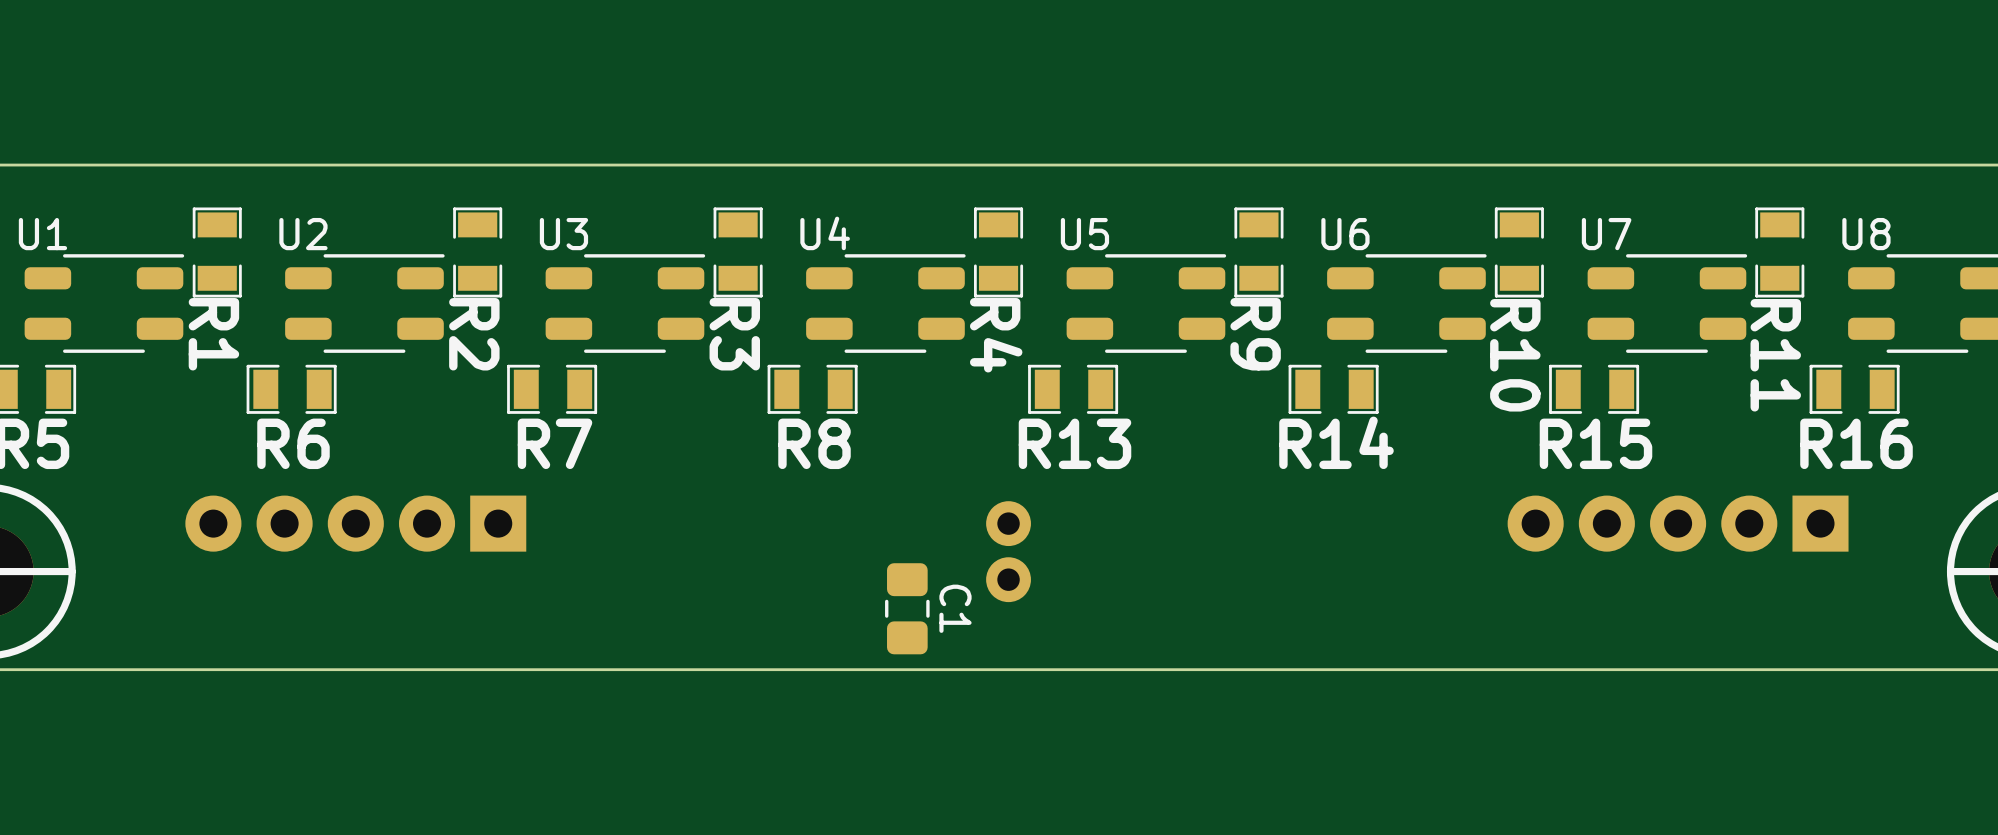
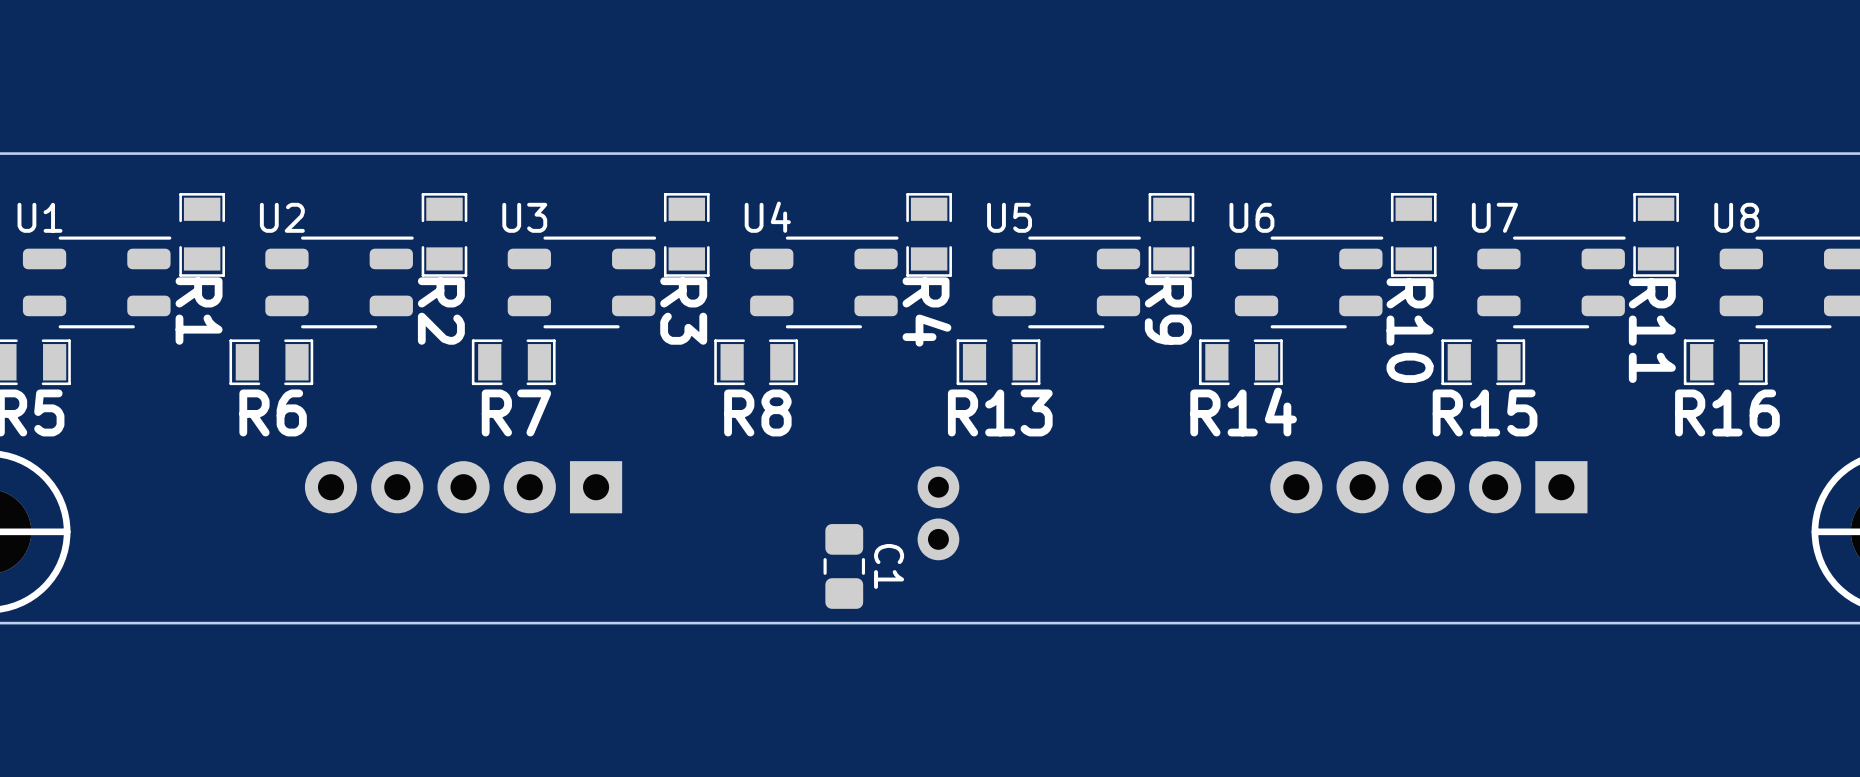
part position: (355, 523) -> (463, 487)
part position: (1678, 523) -> (1428, 487)

